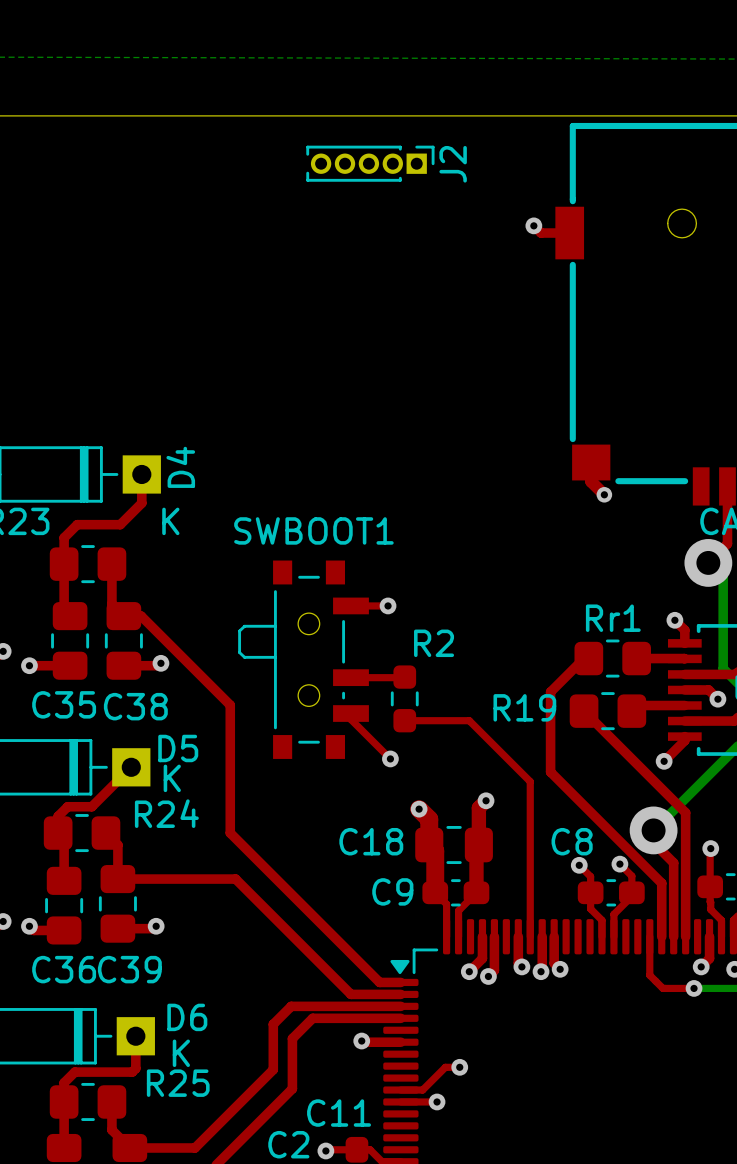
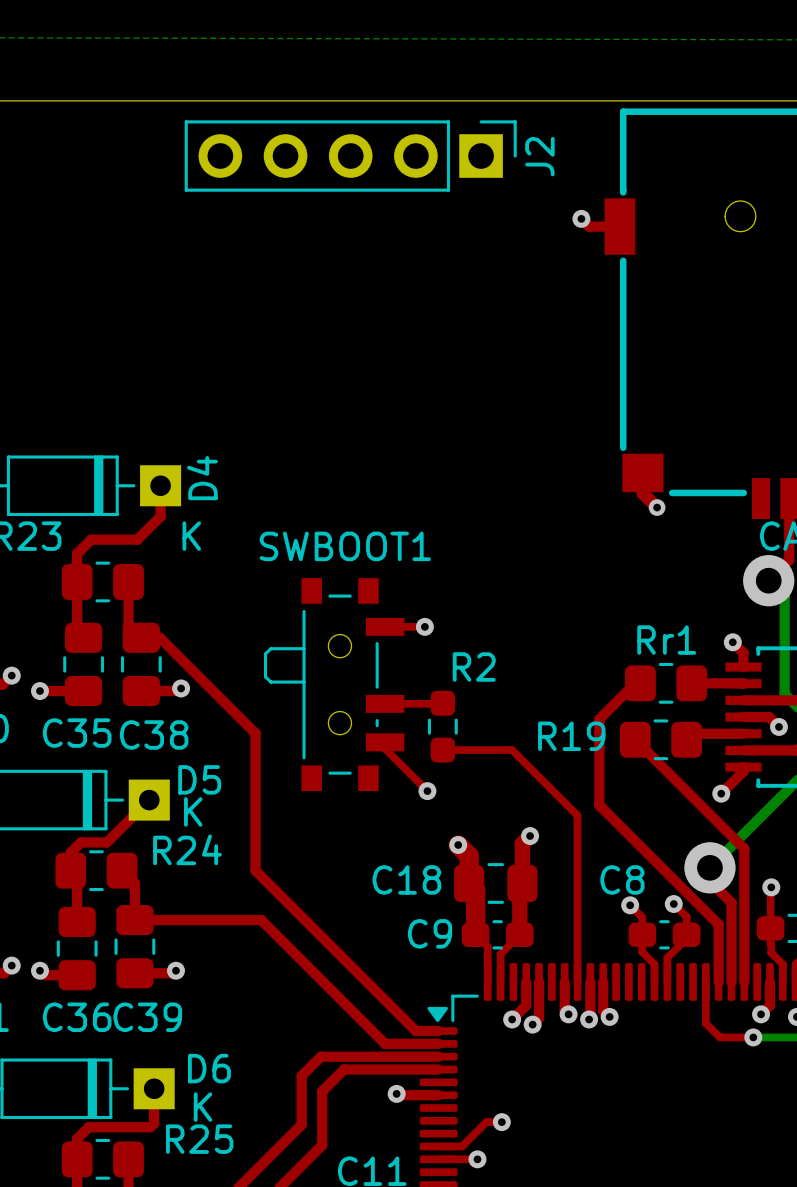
J2 footprint: [306, 145, 435, 182] -> [184, 120, 517, 192]
J2 name position: J2 (453, 164) -> J2 (539, 156)

